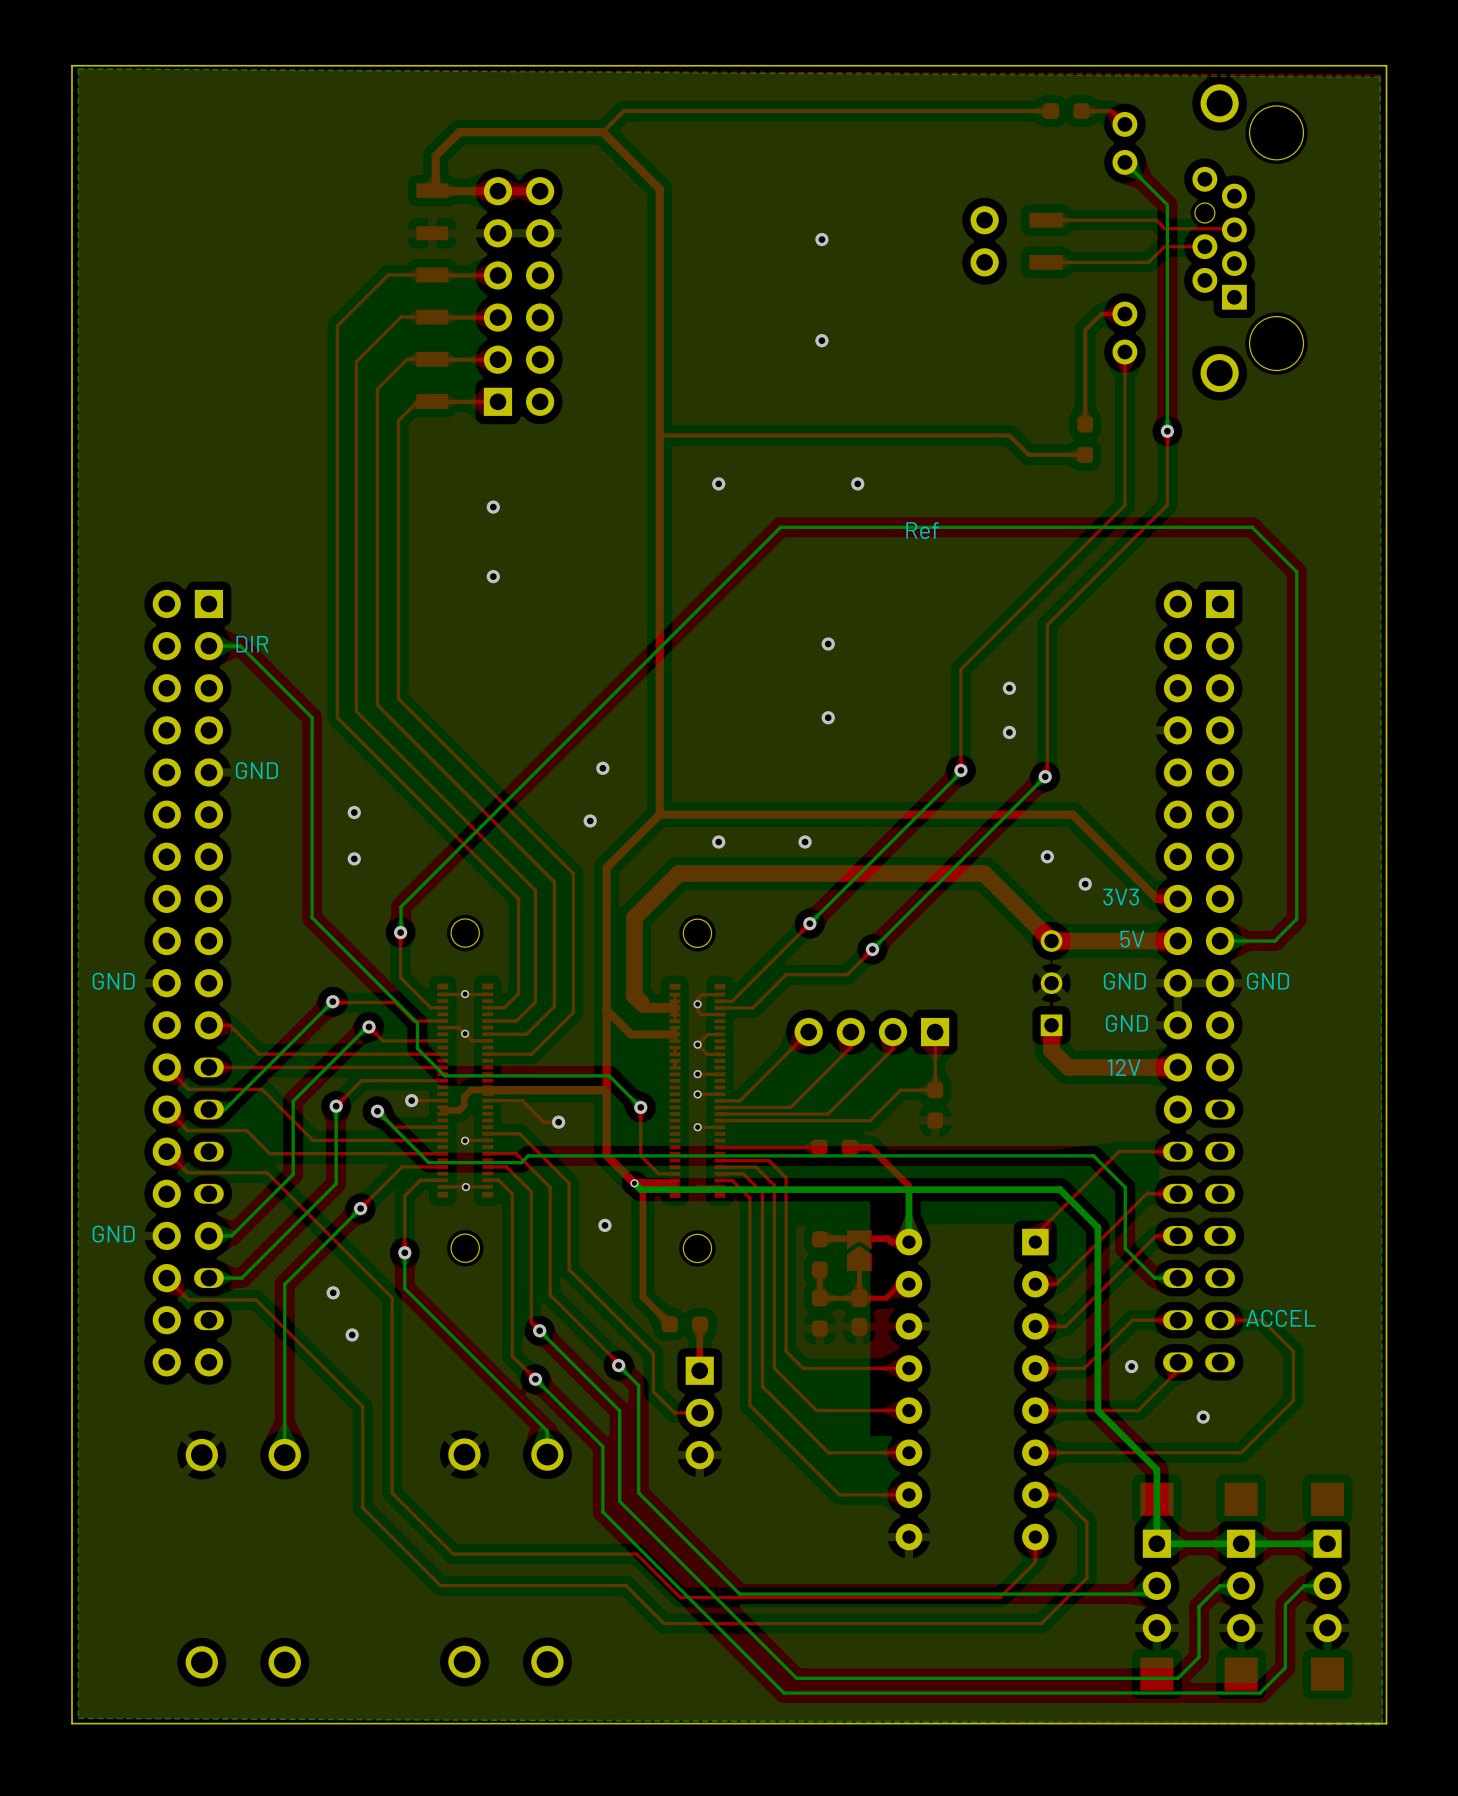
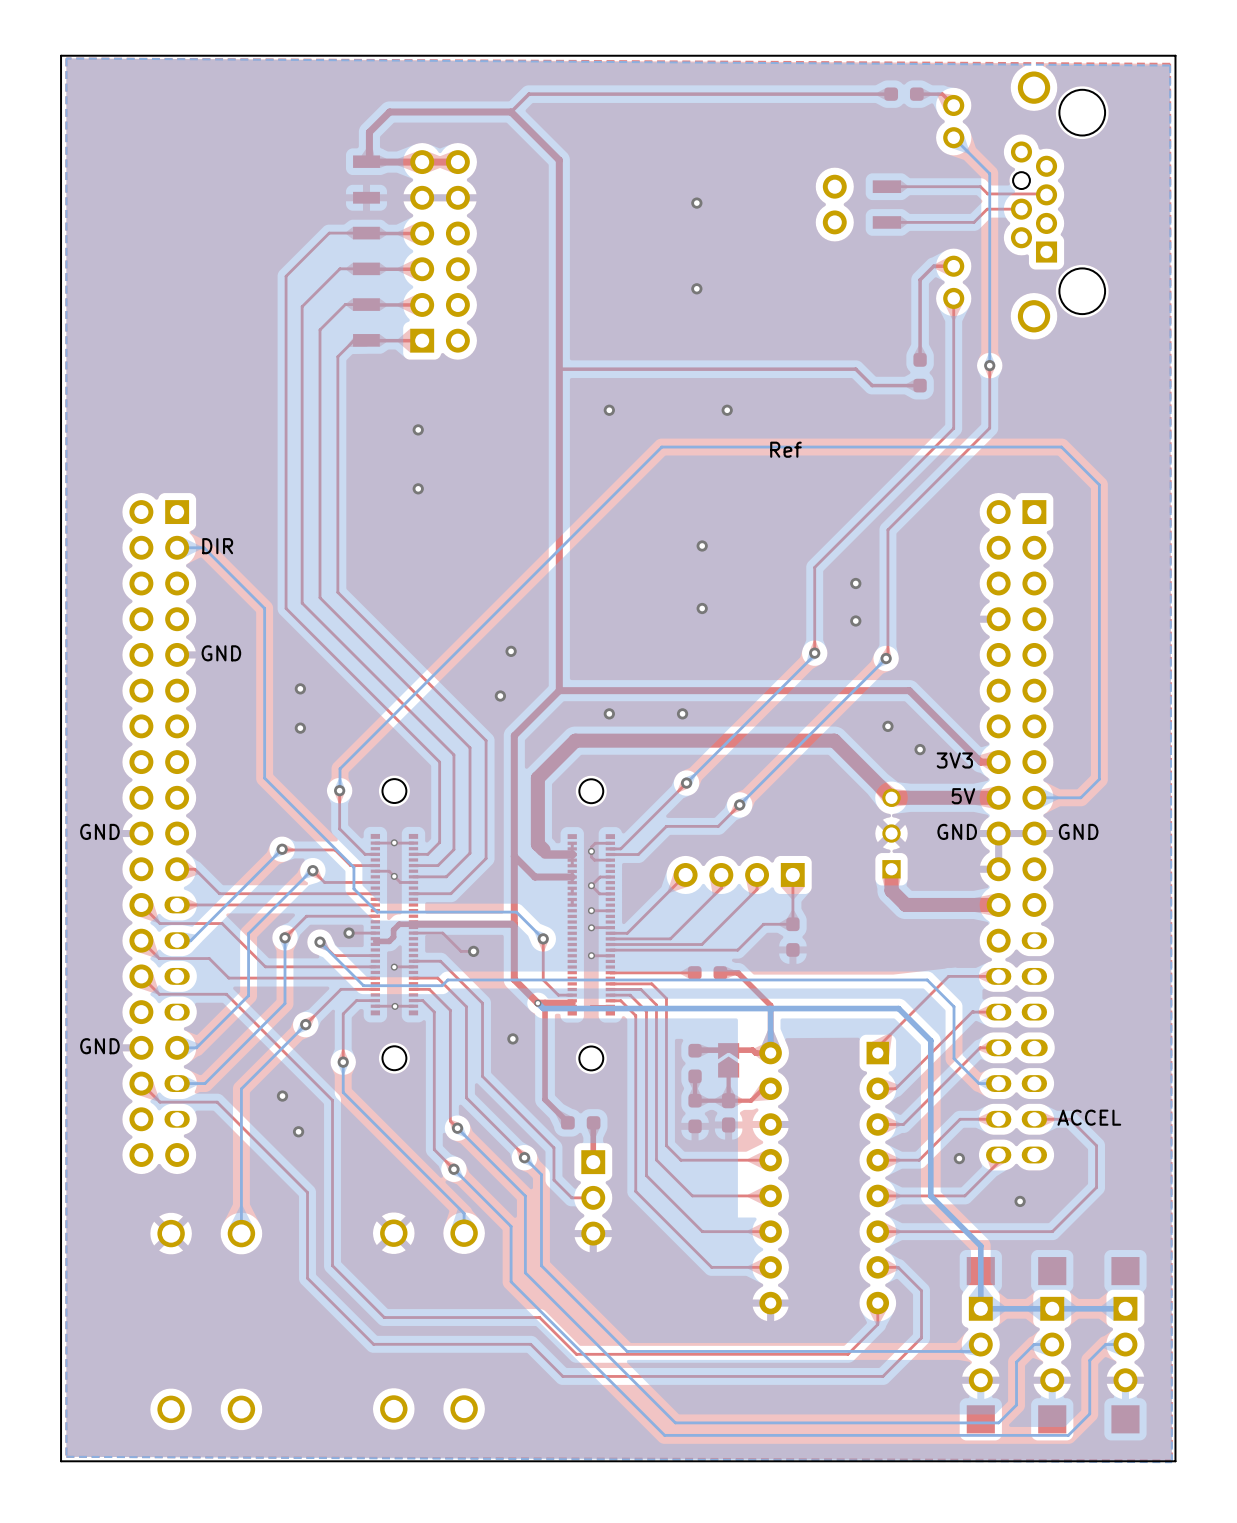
text: GND (1126, 1023) -> none
text: 12V (1124, 1067) -> none

